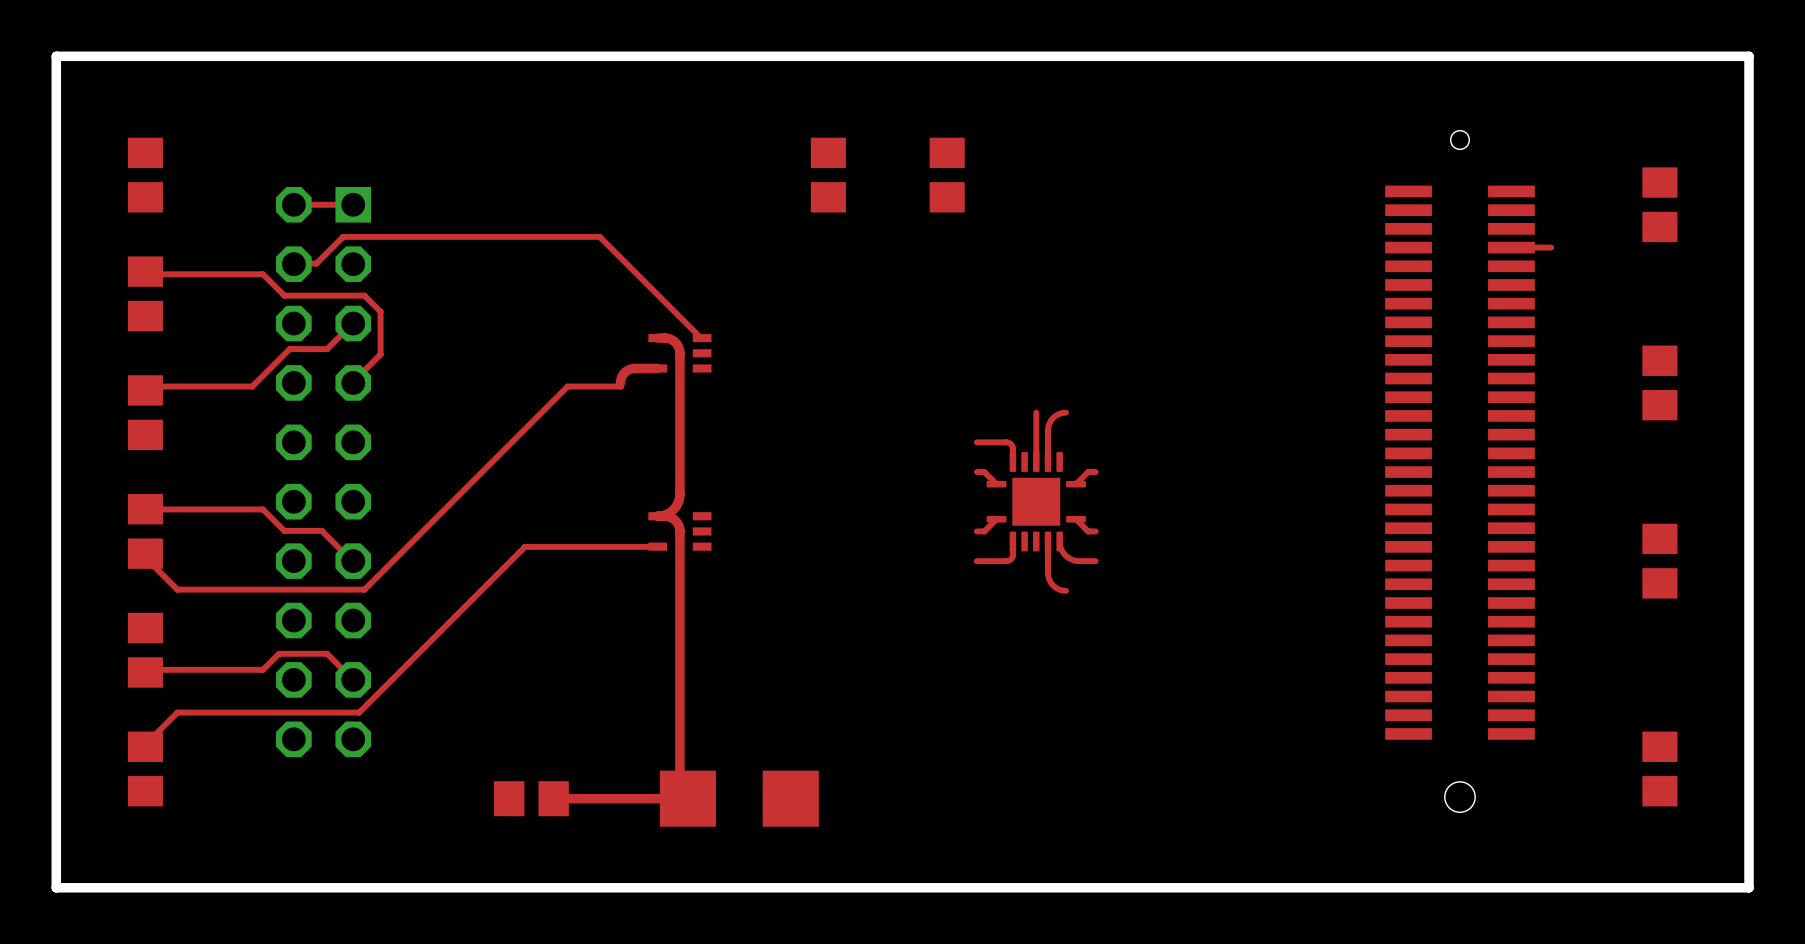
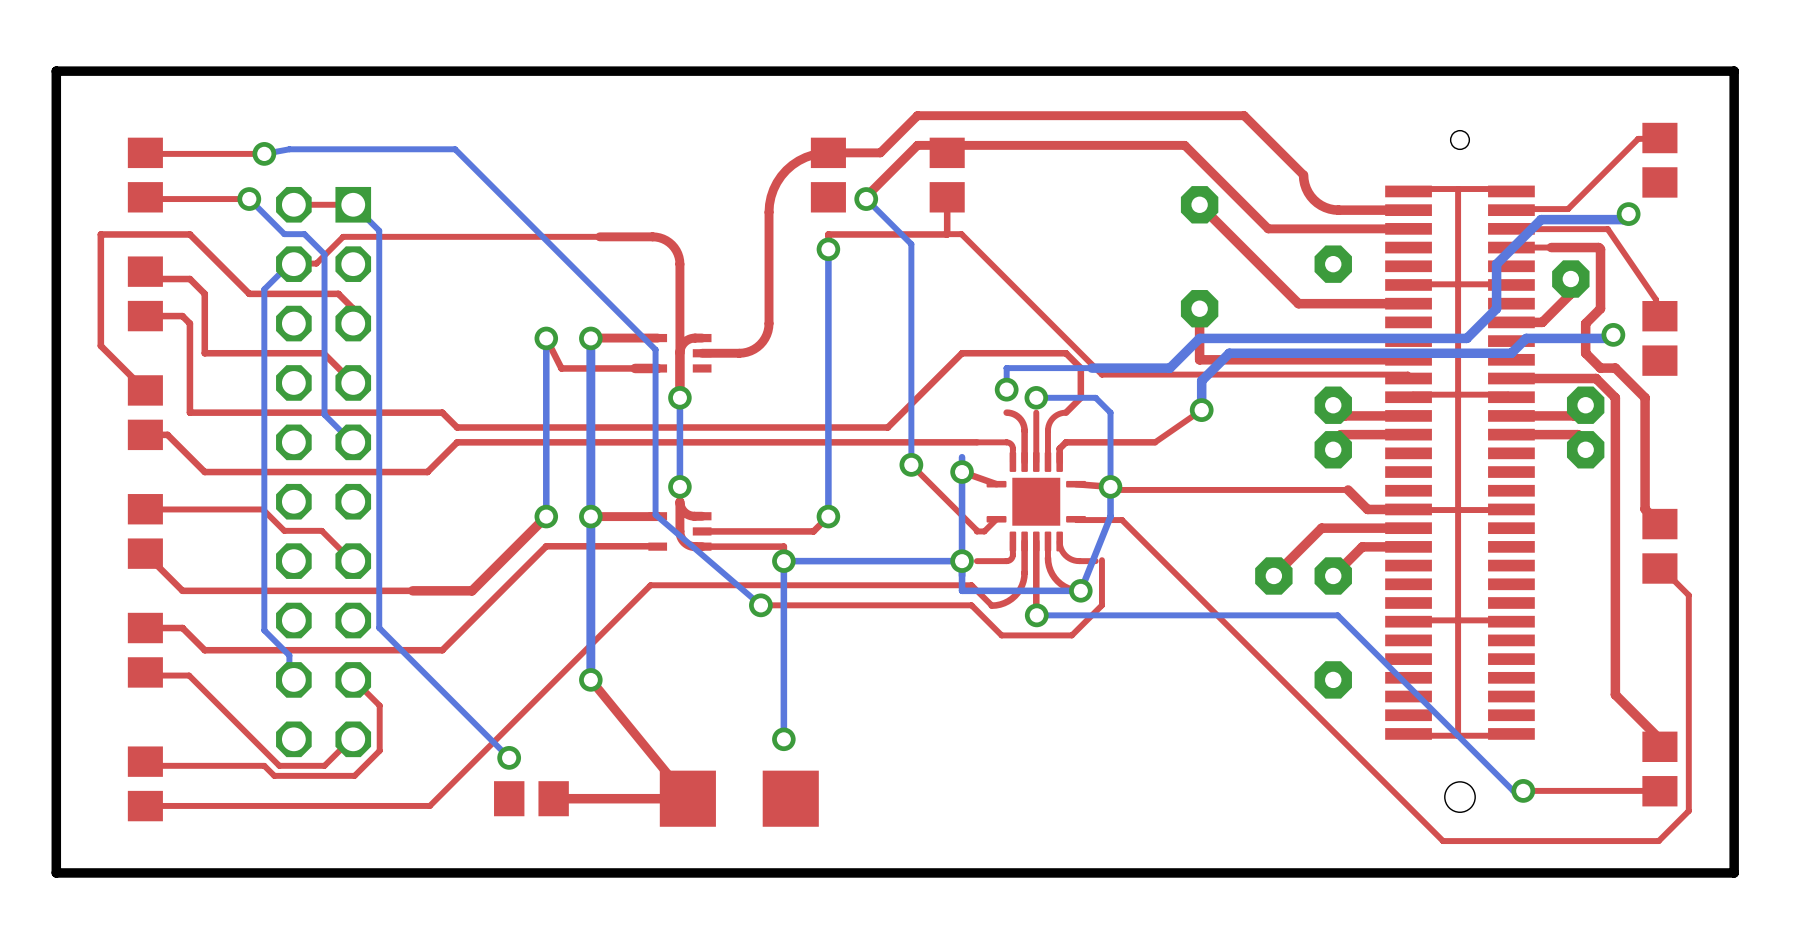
board edge: (56, 71) (56, 56) (1749, 56) (1749, 887) (56, 887) (56, 872) -> (56, 71) (1734, 71) (1734, 872) (56, 872)
top track: none -> (1659, 138) (1638, 138) (1568, 209) (1511, 210)
top track: none -> (145, 152) (264, 153)
top track: none -> (947, 152) (939, 145) (917, 145) (865, 197) (866, 199)
top track: none -> (947, 152) (954, 145) (1184, 145) (1268, 228) (1408, 228)
bottom track: none -> (264, 153) (289, 149) (455, 149) (655, 349) (655, 514) (760, 605)
via: none -> (264, 153)
top track: none -> (1458, 189) (1458, 735)
top track: none -> (1511, 191) (1508, 189) (1412, 189) (1408, 191)
top track: none -> (145, 197) (148, 199) (249, 199)
top track: none -> (947, 197) (947, 234) (828, 234) (828, 249)
bottom track: none -> (249, 199) (284, 234) (304, 234) (324, 254) (324, 414) (353, 442)
via: none -> (249, 199)
bottom track: none -> (866, 199) (911, 244) (911, 464)
via: none -> (866, 199)
bottom track: none -> (353, 204) (379, 230) (379, 627) (509, 757)
top track: none -> (1199, 204) (1298, 303) (1408, 303)
part: none -> (1199, 204)
part position: (1659, 204) -> (1659, 160)
top track: none -> (1408, 210) (1338, 210) (1321, 205) (1308, 192) (1303, 175) (1244, 115) (917, 115) (880, 152) (820, 153) (798, 160) (786, 170) (773, 189) (769, 204) (769, 323) (766, 334) (760, 344) (747, 352) (702, 353)
bottom track: none -> (1628, 214) (1623, 219) (1541, 219) (1496, 264) (1496, 308) (1466, 338) (1199, 338) (1169, 368) (1006, 368) (1006, 389)
via: none -> (1628, 214)
top track: none -> (1511, 228) (1607, 229) (1655, 299) (1659, 316)
top track: none -> (946, 234) (961, 234) (1101, 374) (1407, 374) (1408, 378)
top track: (599, 236) (701, 338) -> (599, 236) (656, 237) (671, 244) (679, 260) (679, 353) (681, 347) (685, 341) (693, 338) (702, 338)
top track: none -> (1551, 247) (1598, 247) (1600, 249) (1600, 308) (1585, 323) (1585, 353) (1600, 368) (1615, 368) (1645, 397) (1645, 509) (1659, 524) (1658, 520)
bottom track: none -> (828, 249) (828, 516)
via: none -> (828, 249)
bottom track: none -> (293, 264) (289, 264) (264, 289) (264, 630) (289, 655) (289, 675) (293, 679)
part: none -> (1333, 264)
top track: (145, 271) (145, 274) (262, 274) (284, 295) (364, 295) (380, 311) (380, 354) (353, 382) -> (145, 271) (152, 279) (189, 279) (204, 293) (204, 353) (323, 353) (353, 382)
top track: none -> (1570, 279) (1570, 293) (1542, 322) (1511, 322)
part: none -> (1570, 279)
top track: none -> (1511, 284) (1408, 284)
top track: none -> (1199, 308) (1199, 359) (1408, 359)
part: none -> (1199, 308)
top track: none -> (145, 316) (182, 316) (189, 323) (189, 412) (442, 412) (457, 427) (887, 427) (962, 353) (1065, 353) (1080, 368) (1080, 397) (1065, 412)
top track: (353, 323) (327, 349) (289, 349) (252, 386) (145, 386) (145, 390) -> (353, 323) (353, 308) (338, 293) (249, 293) (189, 234) (100, 234) (100, 345) (145, 390)
bottom track: none -> (1613, 334) (1609, 338) (1526, 338) (1511, 353) (1229, 353) (1201, 380) (1201, 410)
via: none -> (1613, 334)
top track: none -> (546, 338) (561, 368) (635, 368)
bottom track: none -> (546, 338) (546, 516)
via: none -> (546, 338)
bottom track: none -> (590, 338) (590, 679)
via: none -> (590, 338)
top track: (657, 338) (666, 338) (673, 341) (677, 345) (679, 353) -> (657, 338) (590, 338)
top track: (635, 368) (623, 374) (621, 386) (567, 386) (364, 589) (177, 589) (145, 557) (145, 553) -> (546, 516) (472, 590) (182, 590) (145, 553)
top track: none -> (1511, 378) (1596, 378) (1615, 397) (1615, 694) (1659, 739)
part position: (1659, 382) -> (1659, 338)
via: none -> (1006, 389)
top track: (679, 397) (679, 486) -> none
bottom track: none -> (679, 397) (679, 486)
via: none -> (679, 397)
bottom track: none -> (1036, 397) (1095, 397) (1110, 412) (1110, 516) (1080, 590) (962, 590) (962, 457)
via: none -> (1036, 397)
top track: none -> (1511, 397) (1508, 394) (1412, 394) (1408, 397)
top track: none -> (1333, 405) (1344, 415) (1408, 415)
part: none -> (1333, 405)
top track: none -> (1585, 405) (1574, 415) (1511, 415)
part: none -> (1585, 405)
top track: none -> (1201, 410) (1155, 442) (1065, 442) (1059, 448) (1059, 461)
via: none -> (1201, 410)
top track: none -> (1006, 412) (1017, 416) (1023, 423) (1024, 461)
top track: none -> (145, 434) (167, 434) (204, 472) (427, 472) (457, 442) (976, 442)
top track: none -> (1408, 434) (1340, 434) (1333, 449)
top track: none -> (1511, 434) (1577, 434) (1585, 442) (1585, 449)
part: none -> (1333, 449)
part: none -> (1585, 449)
top track: none -> (911, 464) (976, 531)
via: none -> (911, 464)
via: none -> (962, 472)
top track: (976, 472) (984, 472) (996, 484) -> (962, 472) (996, 484)
top track: (1095, 472) (1088, 472) (1076, 484) -> (1511, 509) (1367, 509) (1348, 489) (1112, 489) (1110, 486) (1076, 484)
via: none -> (679, 486)
via: none -> (1110, 486)
top track: (679, 494) (678, 502) (673, 509) (666, 514) (657, 516) (672, 518) (677, 523) (679, 529) (679, 790) (682, 796) (687, 798) -> (590, 679) (687, 798)
via: none -> (546, 516)
via: none -> (590, 516)
top track: none -> (657, 516) (590, 516)
top track: none -> (702, 516) (687, 514) (681, 508) (679, 501) (680, 533) (681, 539) (687, 544) (695, 546) (783, 546) (783, 561)
top track: none -> (828, 516) (813, 531) (702, 531)
via: none -> (828, 516)
top track: (1076, 519) (1088, 531) (1095, 531) -> (1076, 519) (1122, 520) (1443, 841) (1658, 841) (1688, 810) (1688, 595) (1659, 568)
top track: none -> (1408, 528) (1321, 528) (1273, 575)
top track: none -> (1024, 541) (1024, 577) (1020, 589) (1008, 601) (991, 605)
top track: none -> (1036, 541) (1036, 620)
top track: (657, 546) (524, 546) (359, 712) (177, 712) (145, 746) -> (657, 546) (546, 546) (442, 650) (204, 650) (182, 628) (145, 628)
top track: none -> (1408, 546) (1362, 546) (1333, 575)
top track: (1047, 557) (1048, 575) (1050, 581) (1056, 588) (1065, 590) -> (1047, 557) (1050, 570) (1057, 581) (1068, 588) (1080, 590)
top track: none -> (1101, 560) (1101, 605) (1071, 635) (1001, 635) (971, 605) (760, 605)
via: none -> (783, 561)
bottom track: none -> (962, 561) (783, 561) (783, 739)
via: none -> (962, 561)
part position: (1659, 561) -> (1659, 546)
part: none -> (1273, 575)
part: none -> (1333, 575)
via: none -> (1080, 590)
via: none -> (760, 605)
top track: none -> (991, 605) (971, 585) (650, 585) (429, 805) (145, 806)
bottom track: none -> (1036, 615) (1337, 615) (1513, 790) (1523, 790)
via: none -> (1036, 615)
top track: none -> (1511, 621) (1408, 621)
top track: (145, 672) (145, 669) (262, 669) (279, 653) (327, 653) (353, 679) -> (145, 672) (148, 675) (189, 675) (279, 765) (324, 765) (353, 739)
top track: none -> (353, 679) (379, 705) (379, 750) (354, 775) (274, 775) (264, 765) (148, 765) (145, 761)
via: none -> (590, 679)
part: none -> (1333, 679)
top track: none -> (1511, 733) (1508, 735) (1412, 735) (1408, 733)
via: none -> (783, 739)
via: none -> (509, 757)
part position: (145, 769) -> (145, 783)
top track: none -> (1523, 790) (1659, 791)
via: none -> (1523, 790)

